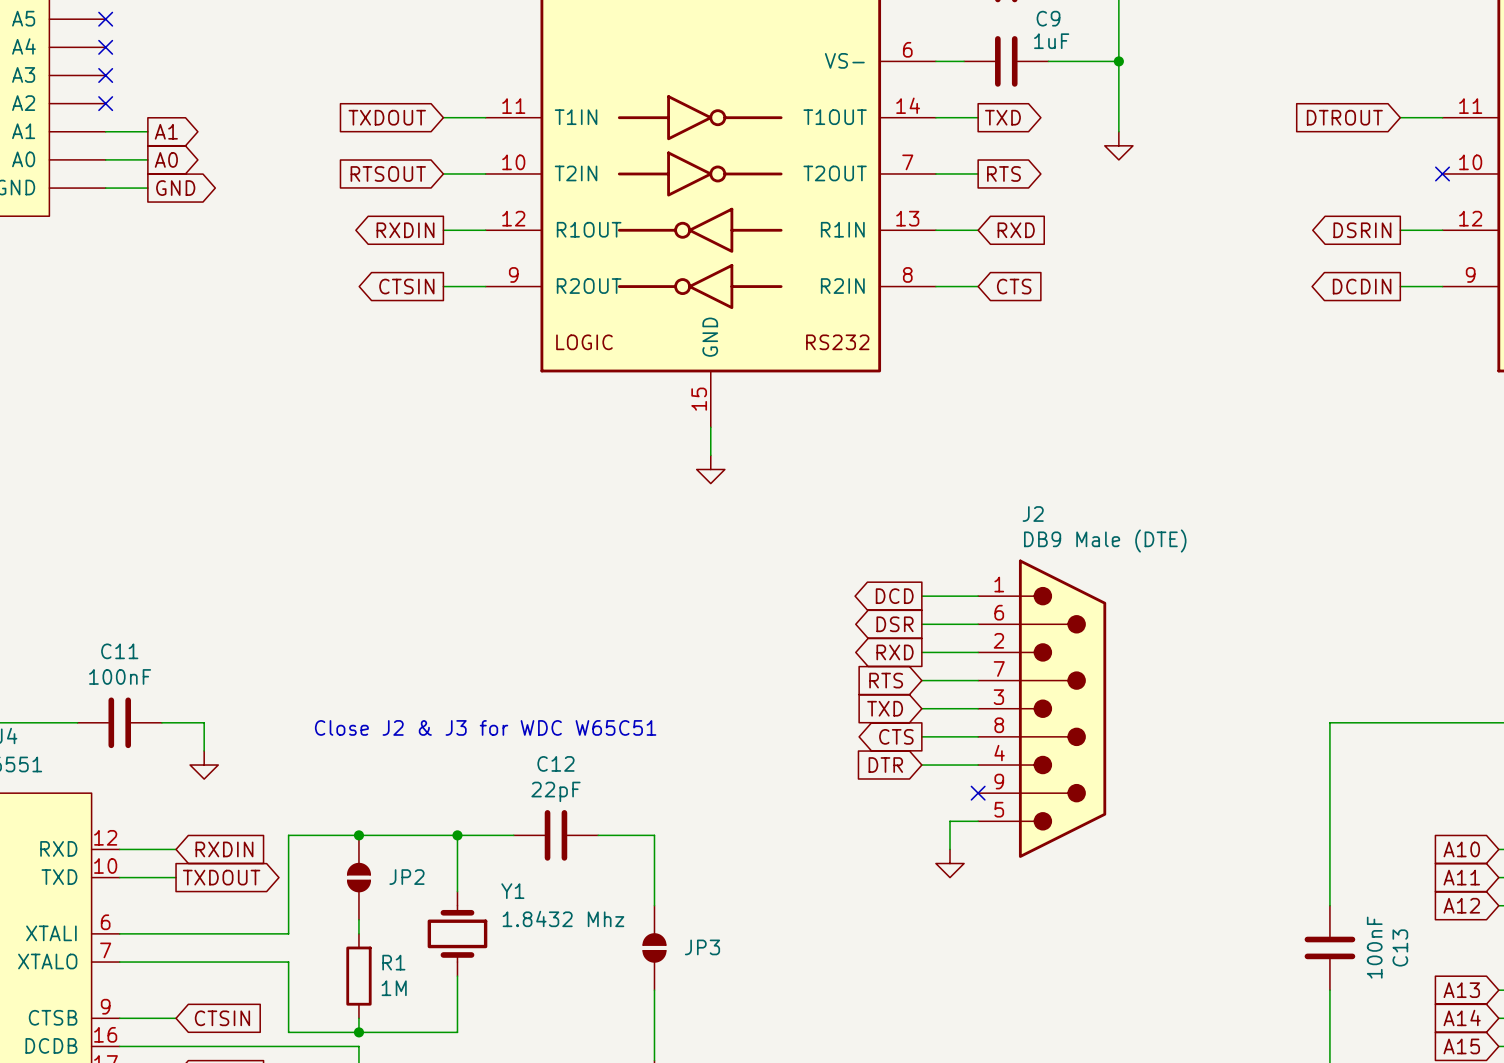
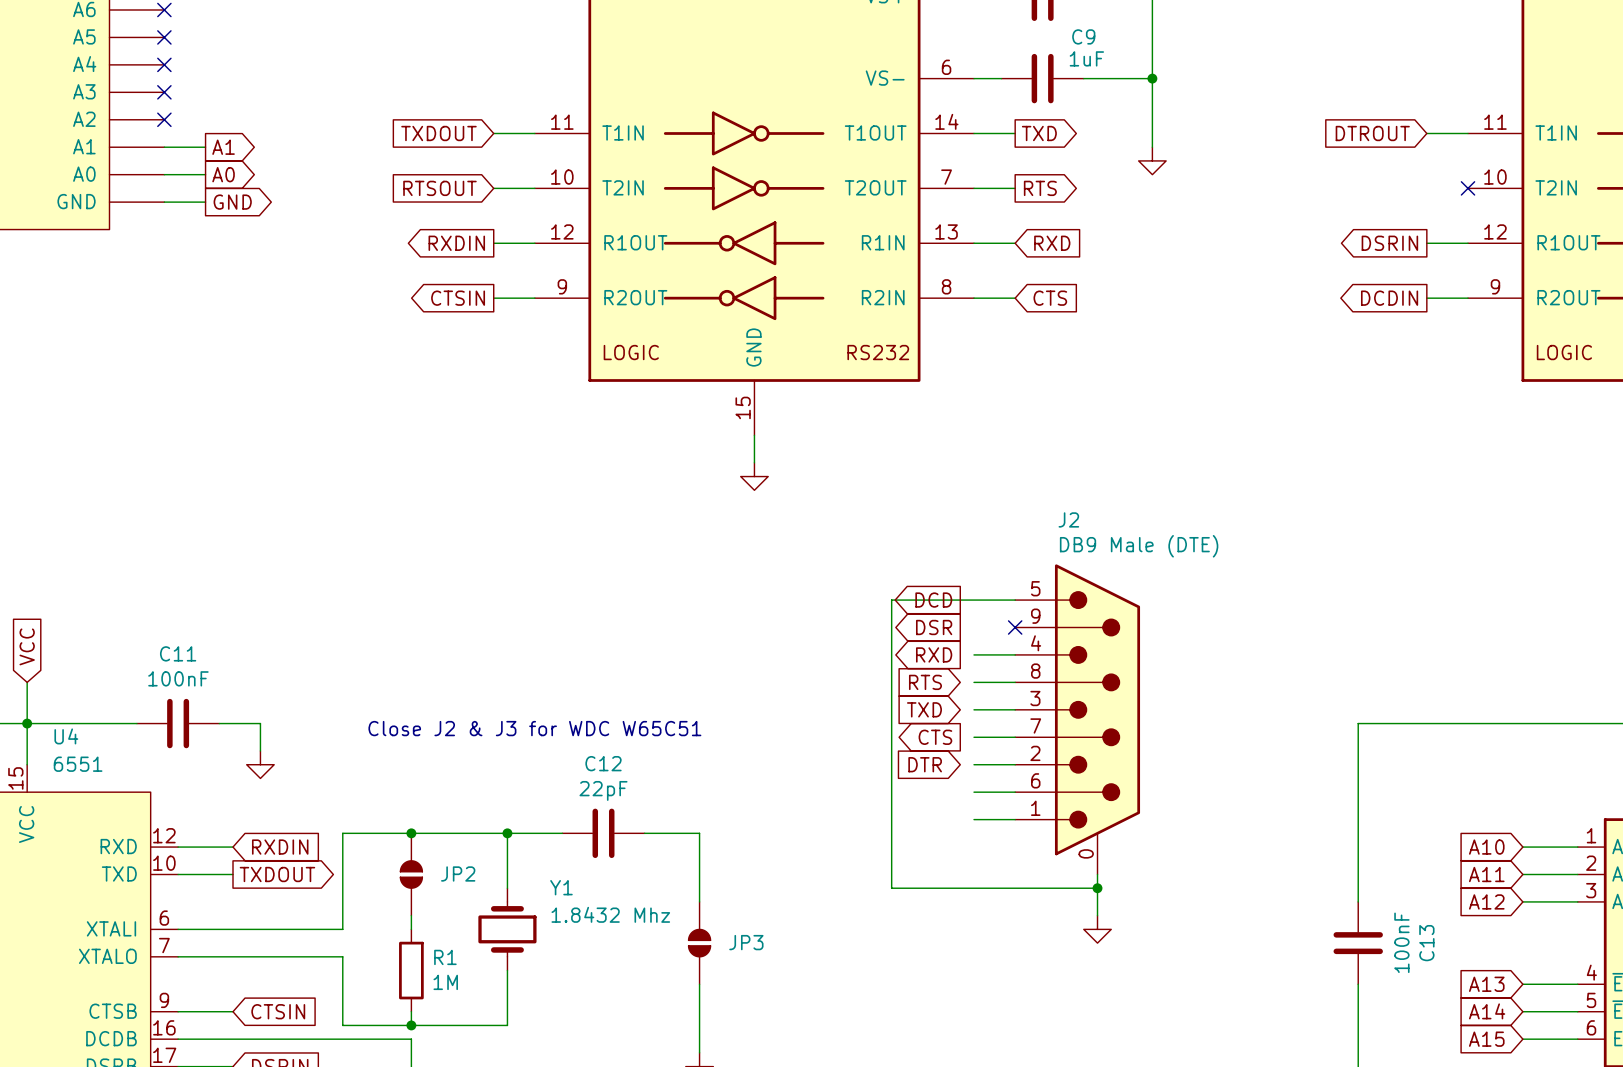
J2 symbol: [978, 559, 1107, 858] -> [1015, 564, 1141, 875]
wire: none -> (960, 600) (891, 600) (891, 888) (1097, 888)
wire: (921, 624) (978, 624) -> none
no-connect mark: none -> (1015, 627)
wire: (921, 652) (935, 652) -> none
wire: (921, 680) (935, 680) -> none
wire: (921, 708) (935, 708) -> none
wire: (921, 736) (935, 736) -> none
wire: (921, 765) (935, 765) -> none
wire: none -> (974, 792) (1015, 792)
no-connect mark: (978, 793) -> none
wire: (950, 821) (950, 849) -> (987, 819) (974, 819)
power symbol position: (950, 863) -> (1097, 929)
wire: none -> (1097, 874) (1097, 915)
junction: none -> (1097, 888)

